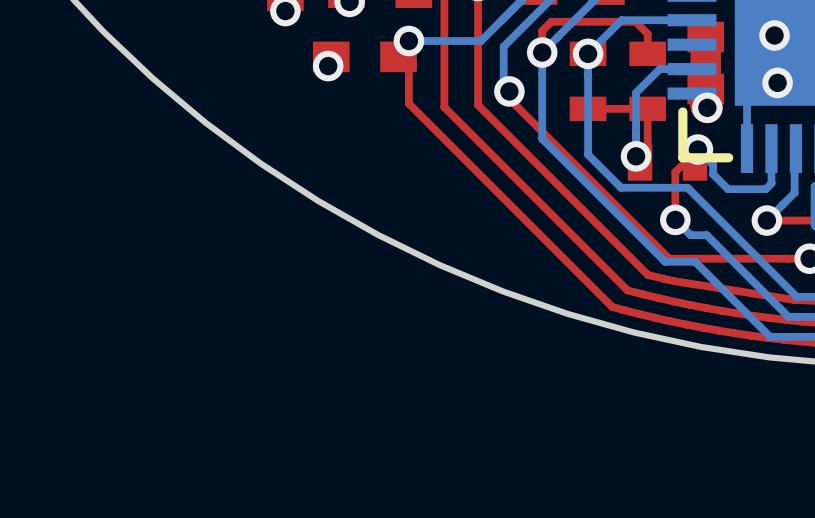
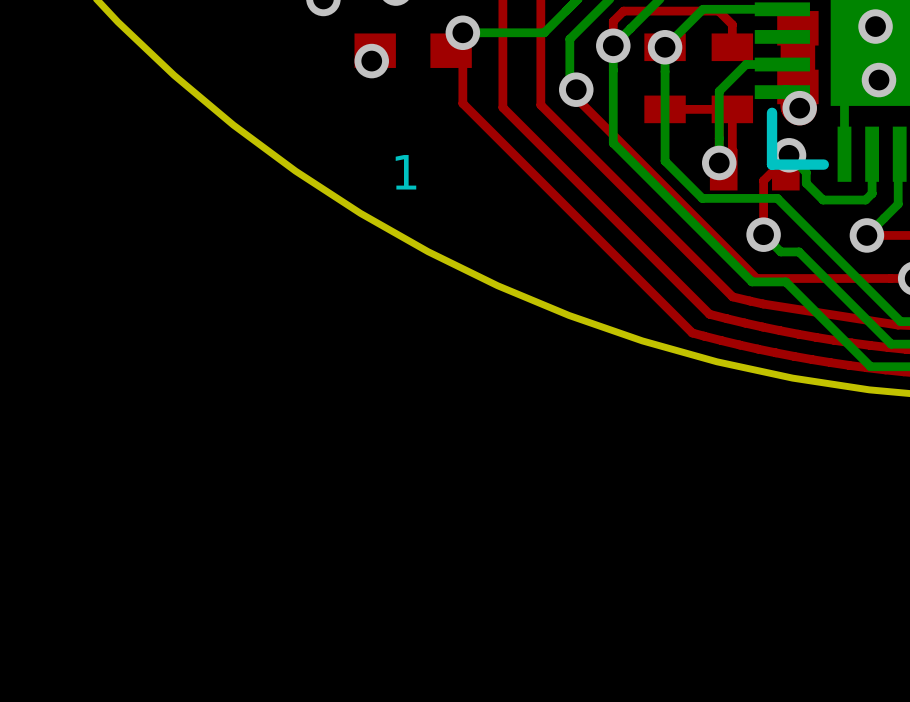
text: none -> 1 (405, 172)

